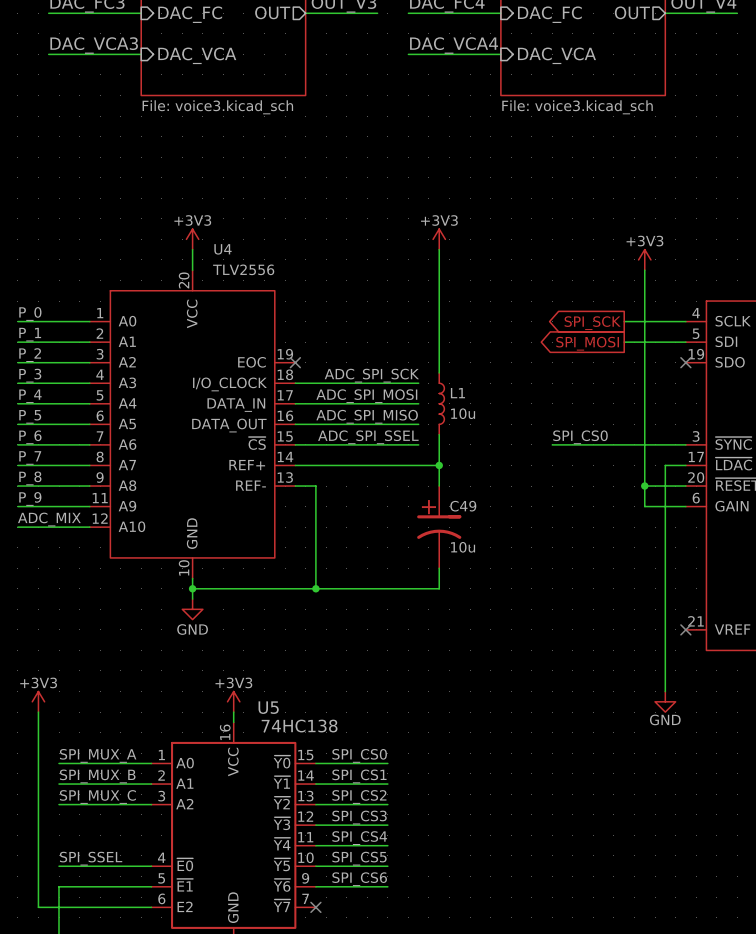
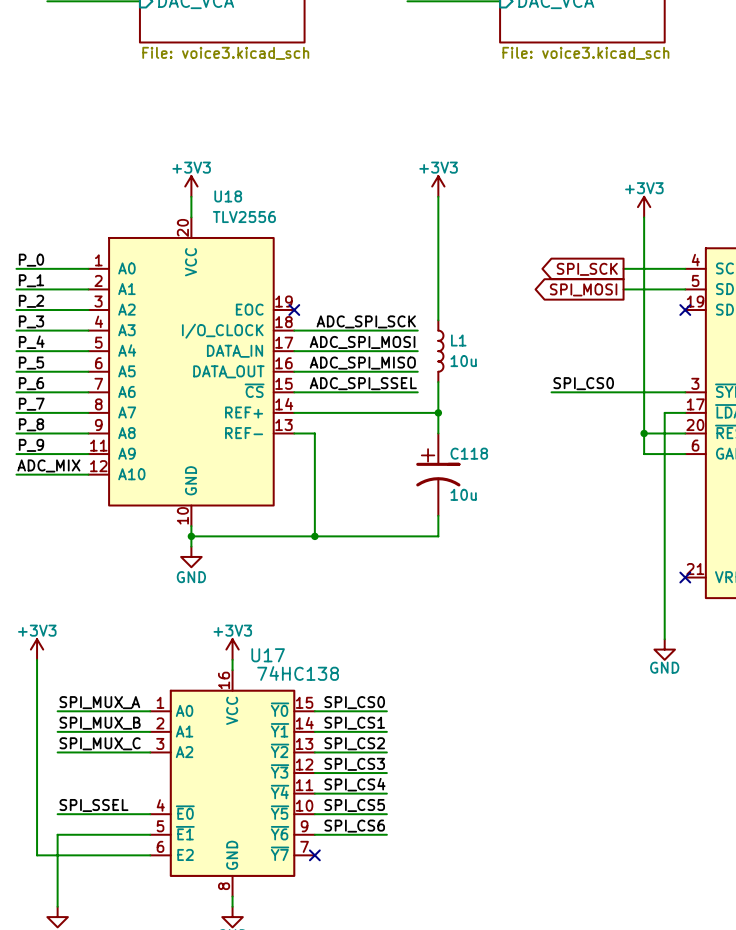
U4 name: U4 (223, 249) -> U18 (228, 196)
C49 name: C49 (463, 506) -> C118 (469, 453)
U5 name: U5 (268, 707) -> U17 (268, 655)

